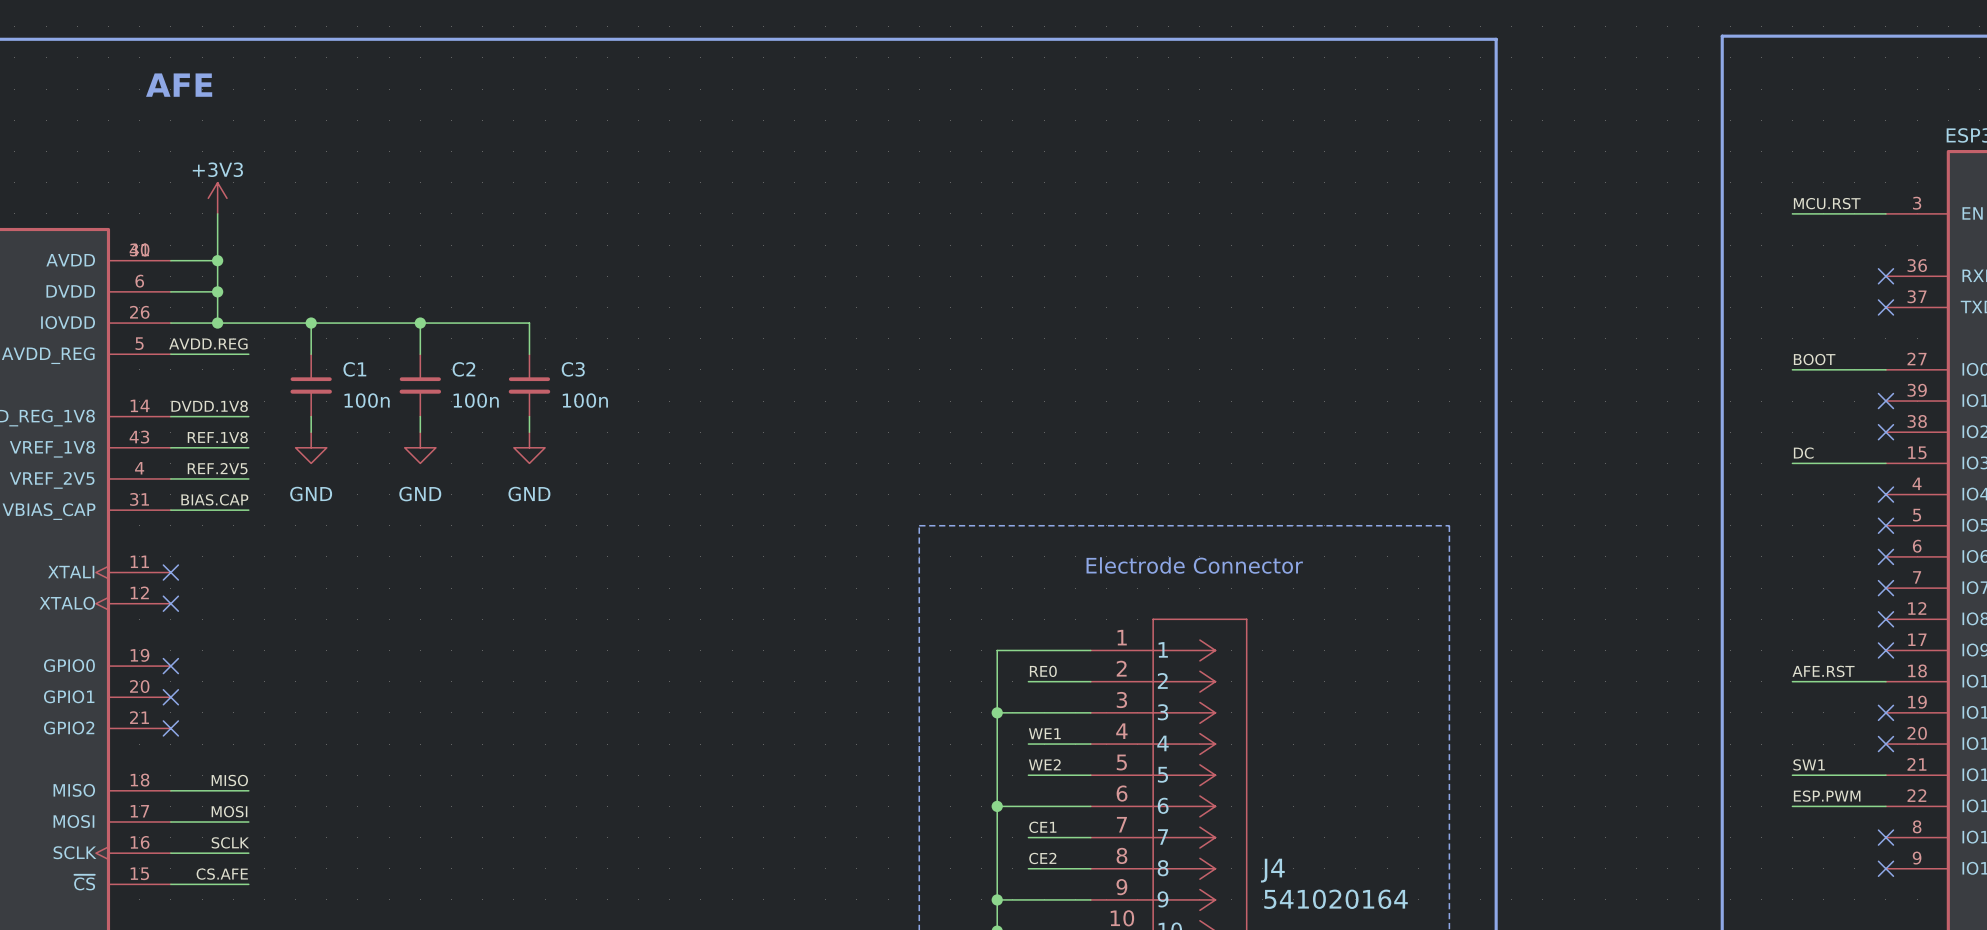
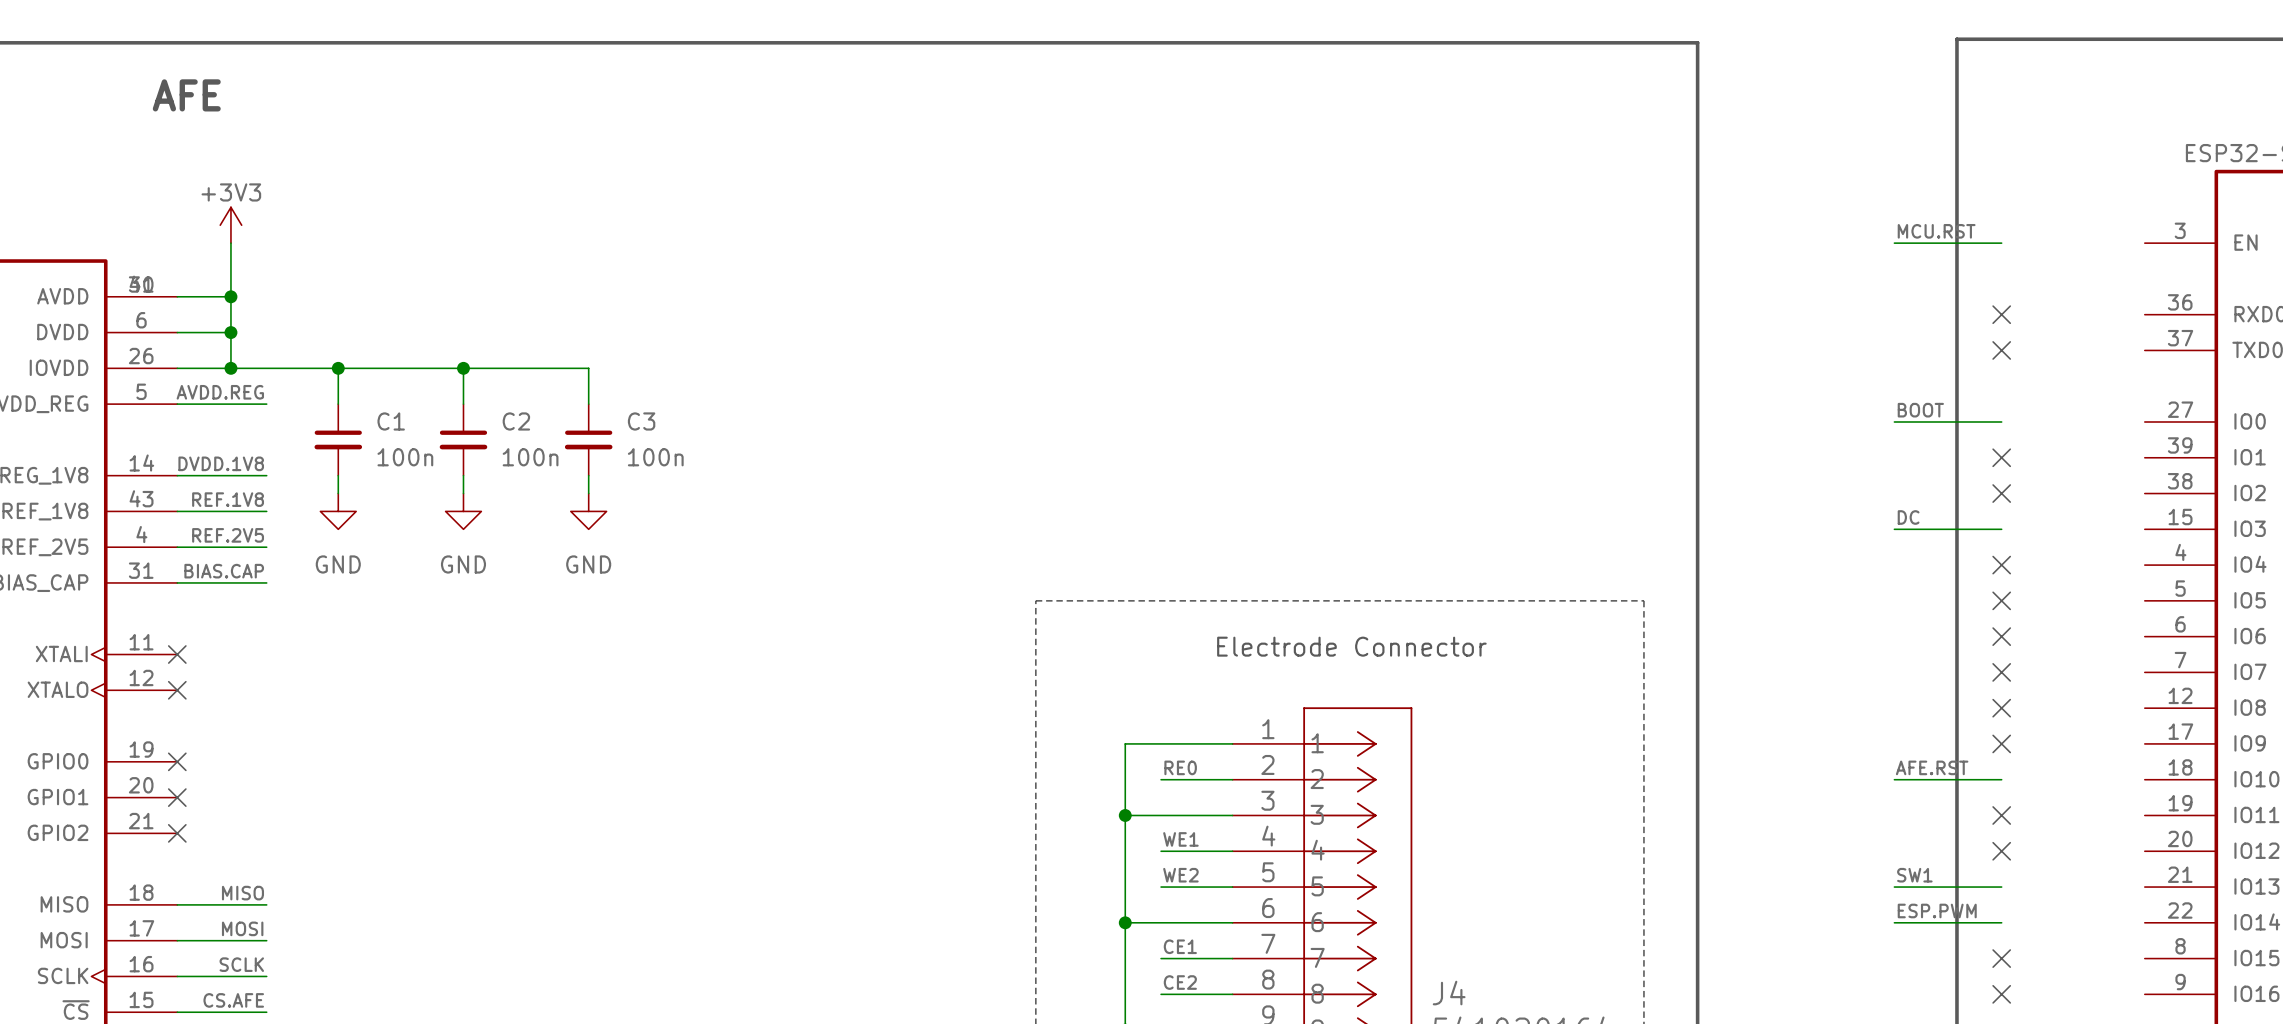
label position: MCU.RST (1827, 203) -> MCU.RST (1936, 231)
wire: (1792, 213) (1885, 213) -> (1894, 243) (2001, 243)
no-connect mark: none -> (2001, 314)
no-connect mark: (1885, 276) -> none
no-connect mark: none -> (2001, 350)
no-connect mark: (1885, 307) -> none
label position: BOOT (1814, 359) -> BOOT (1920, 410)
wire: (1792, 369) (1885, 369) -> (1894, 421) (2001, 421)
no-connect mark: none -> (2001, 457)
no-connect mark: (1885, 401) -> none
no-connect mark: none -> (2001, 493)
no-connect mark: (1885, 432) -> none
label position: DC (1803, 453) -> DC (1908, 517)
wire: (1792, 463) (1885, 463) -> (1894, 529) (2001, 529)
no-connect mark: none -> (2001, 565)
no-connect mark: (1885, 494) -> none
no-connect mark: none -> (2001, 600)
no-connect mark: (1885, 525) -> none
no-connect mark: none -> (2001, 636)
no-connect mark: (1885, 556) -> none
no-connect mark: none -> (2001, 672)
no-connect mark: (1885, 588) -> none
no-connect mark: none -> (2001, 708)
no-connect mark: (1885, 619) -> none
no-connect mark: none -> (2001, 743)
no-connect mark: (1885, 650) -> none
label position: AFE.RST (1823, 671) -> AFE.RST (1932, 767)
wire: (1792, 681) (1885, 681) -> (1894, 779) (2001, 779)
no-connect mark: none -> (2001, 815)
no-connect mark: (1885, 712) -> none
no-connect mark: none -> (2001, 851)
no-connect mark: (1885, 744) -> none
label position: SW1 (1809, 764) -> SW1 (1914, 875)
wire: (1792, 775) (1885, 775) -> (1894, 887) (2001, 887)
label position: ESP.PWM (1827, 796) -> ESP.PWM (1937, 910)
wire: (1792, 806) (1885, 806) -> (1894, 922) (2001, 922)
no-connect mark: none -> (2001, 958)
no-connect mark: (1885, 837) -> none
no-connect mark: none -> (2001, 994)
no-connect mark: (1885, 868) -> none

